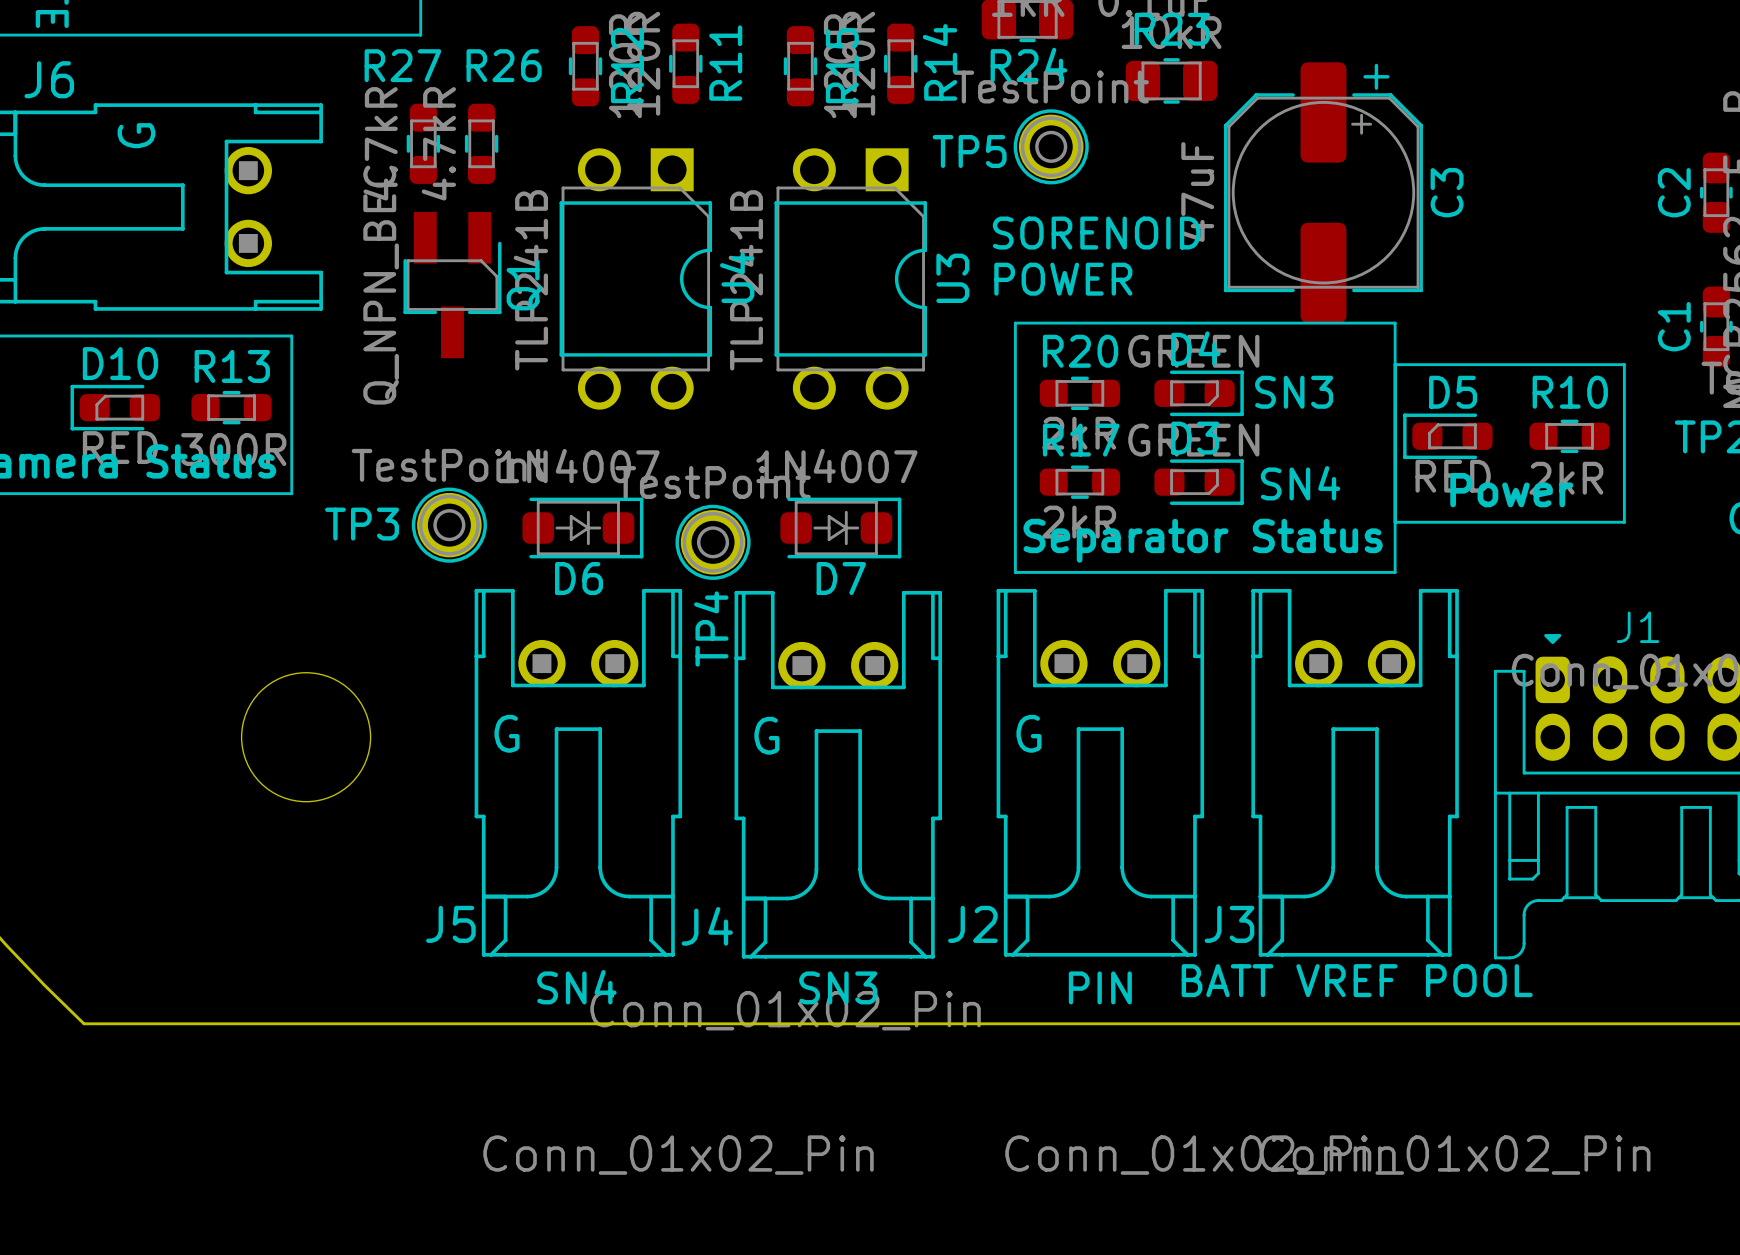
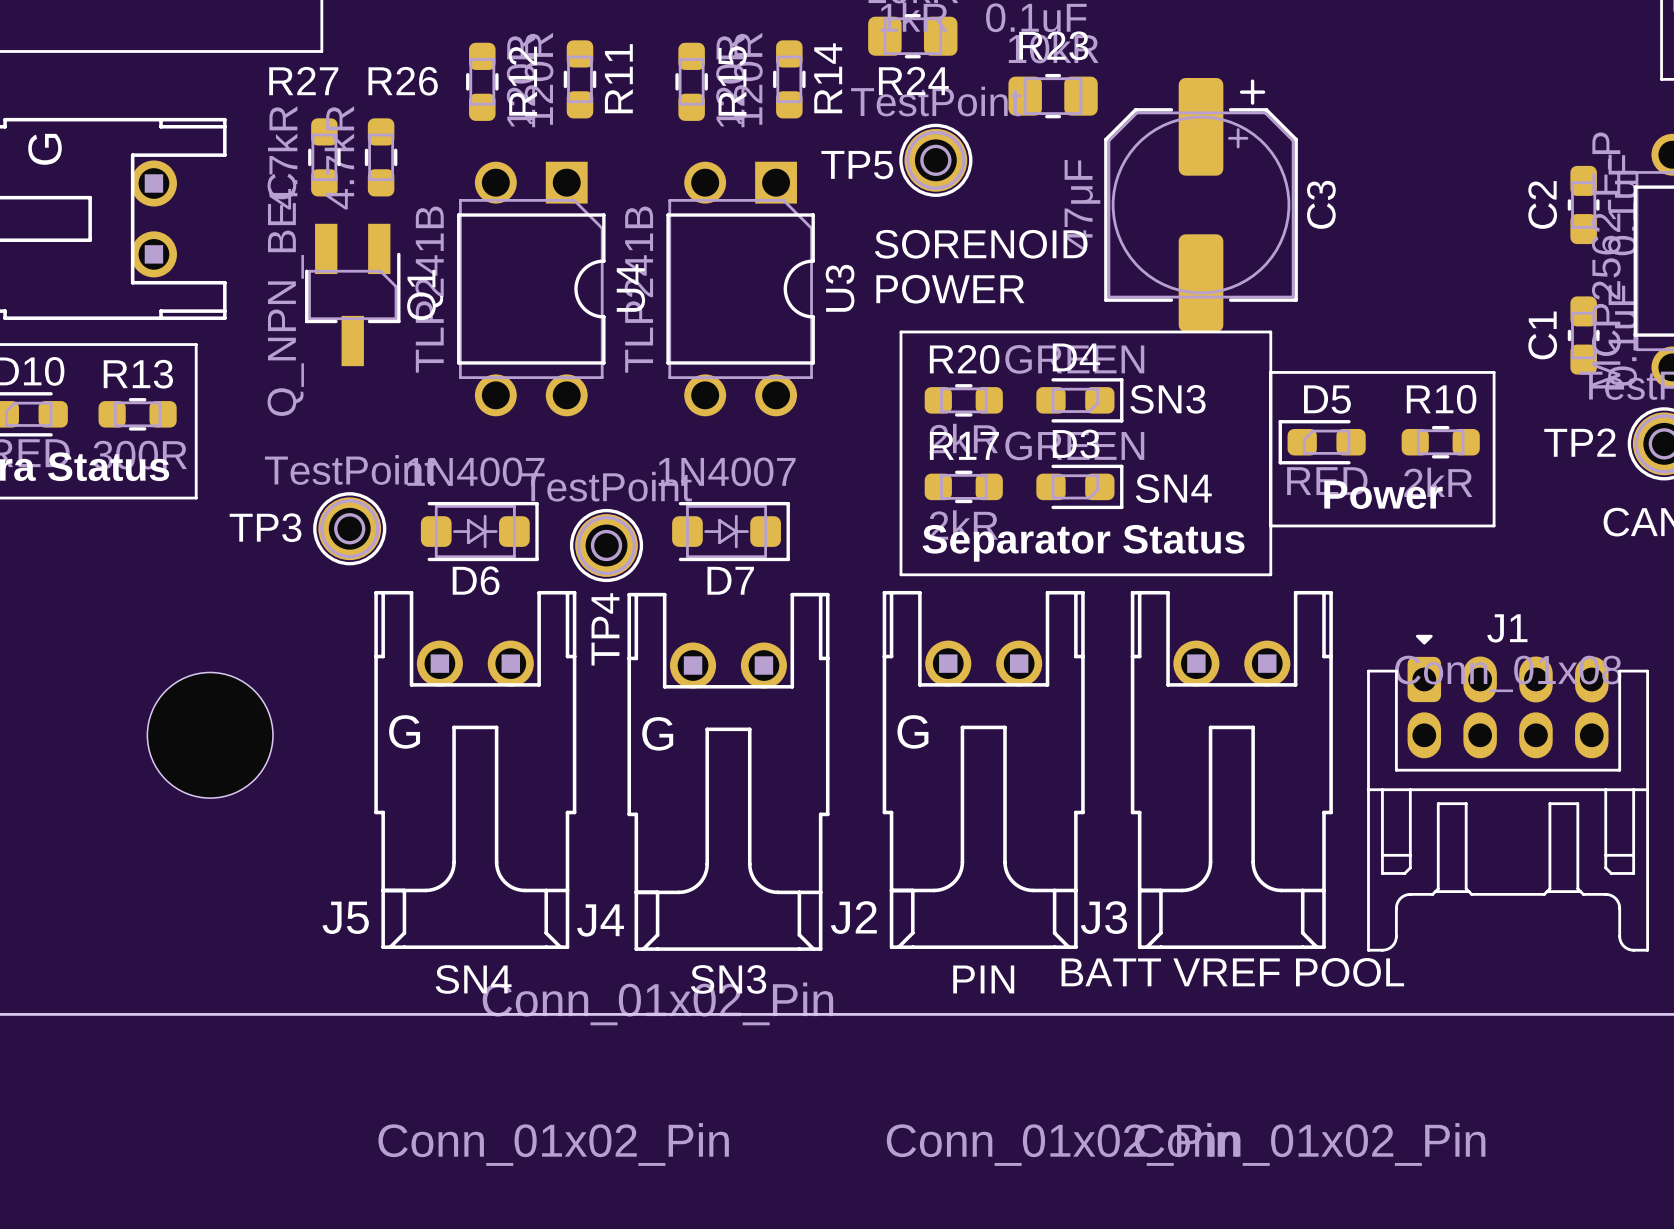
C3 value: 47uF (1197, 192) -> 47μF (1082, 205)

